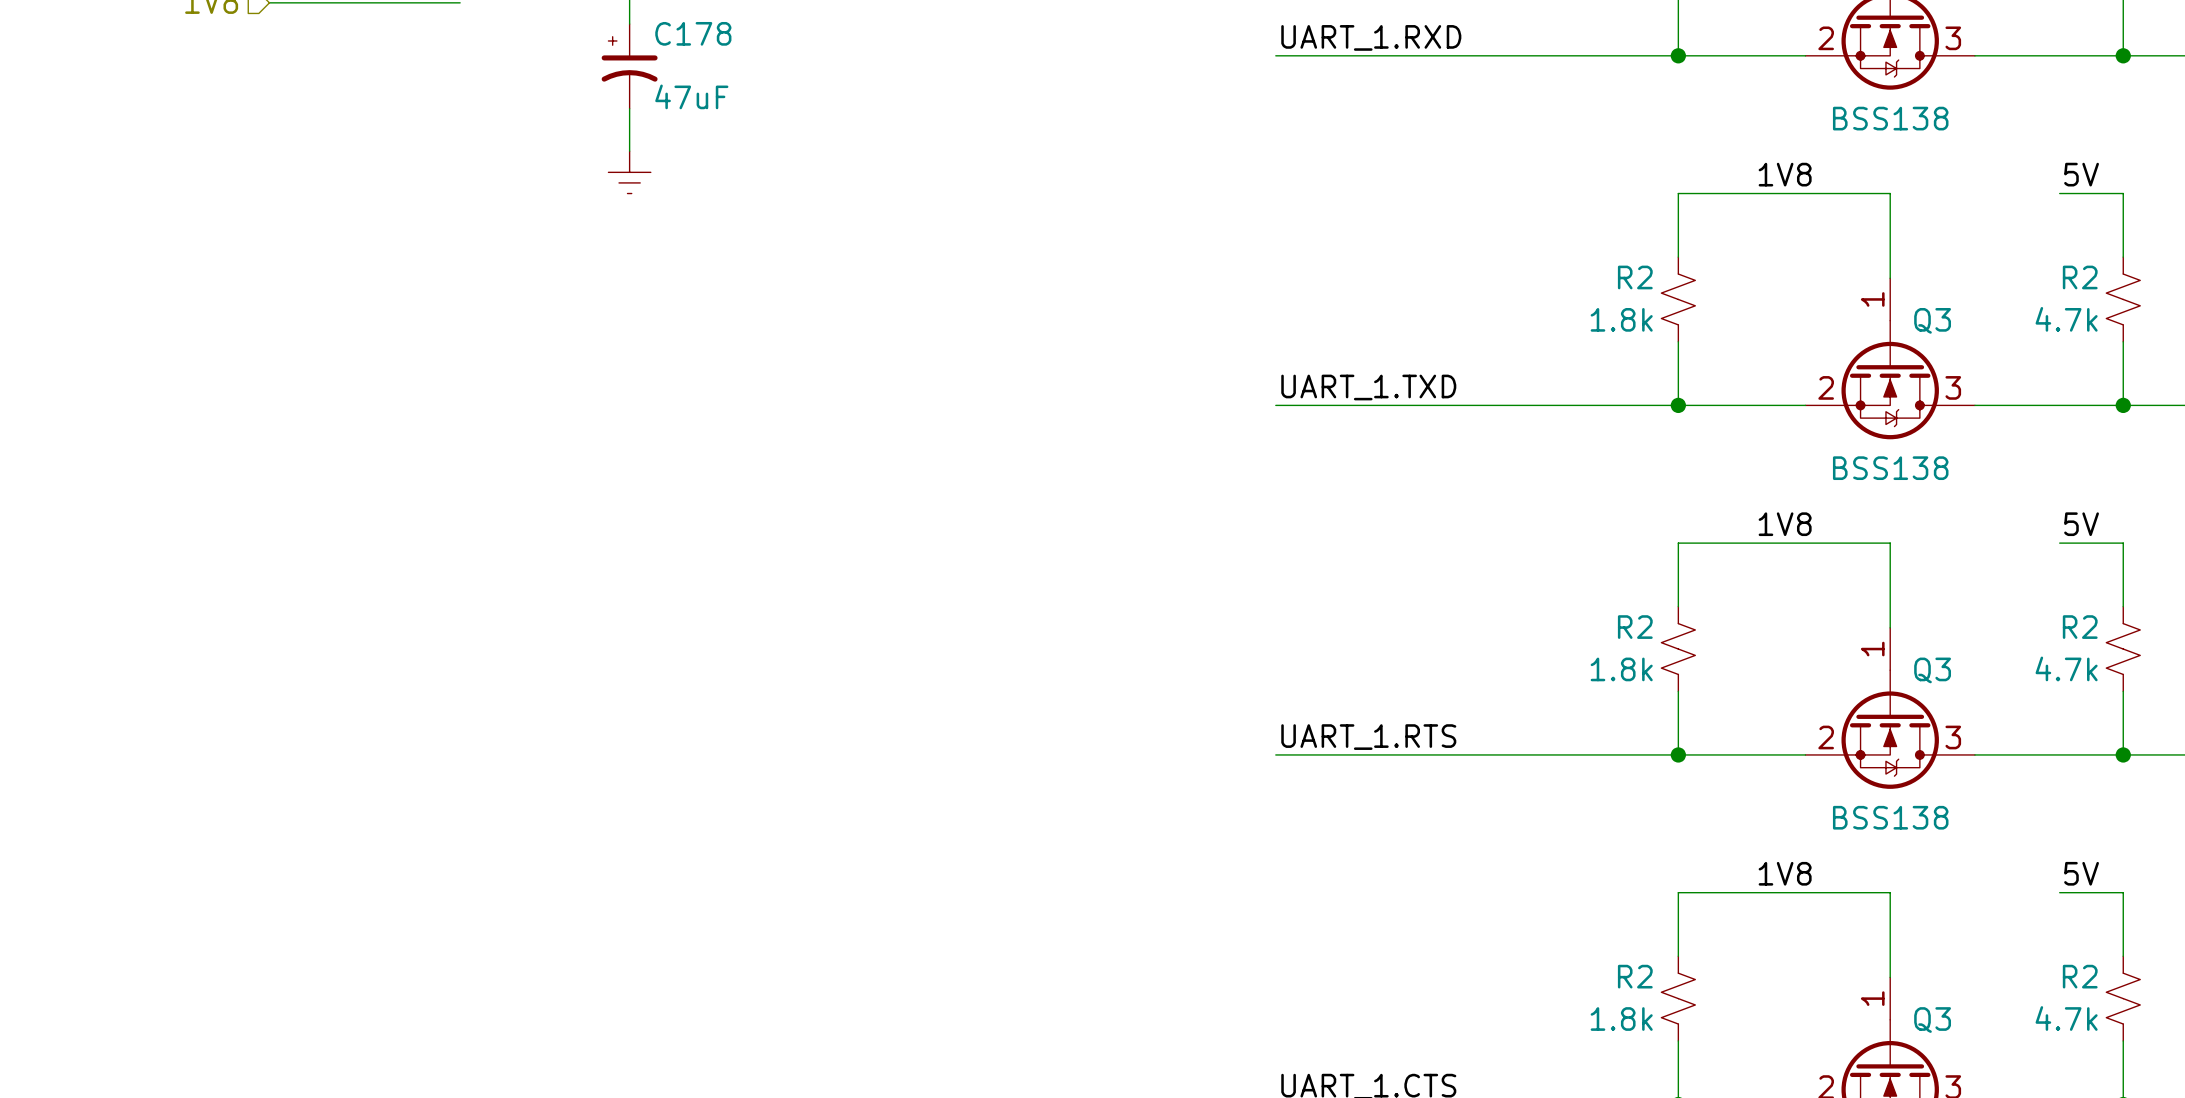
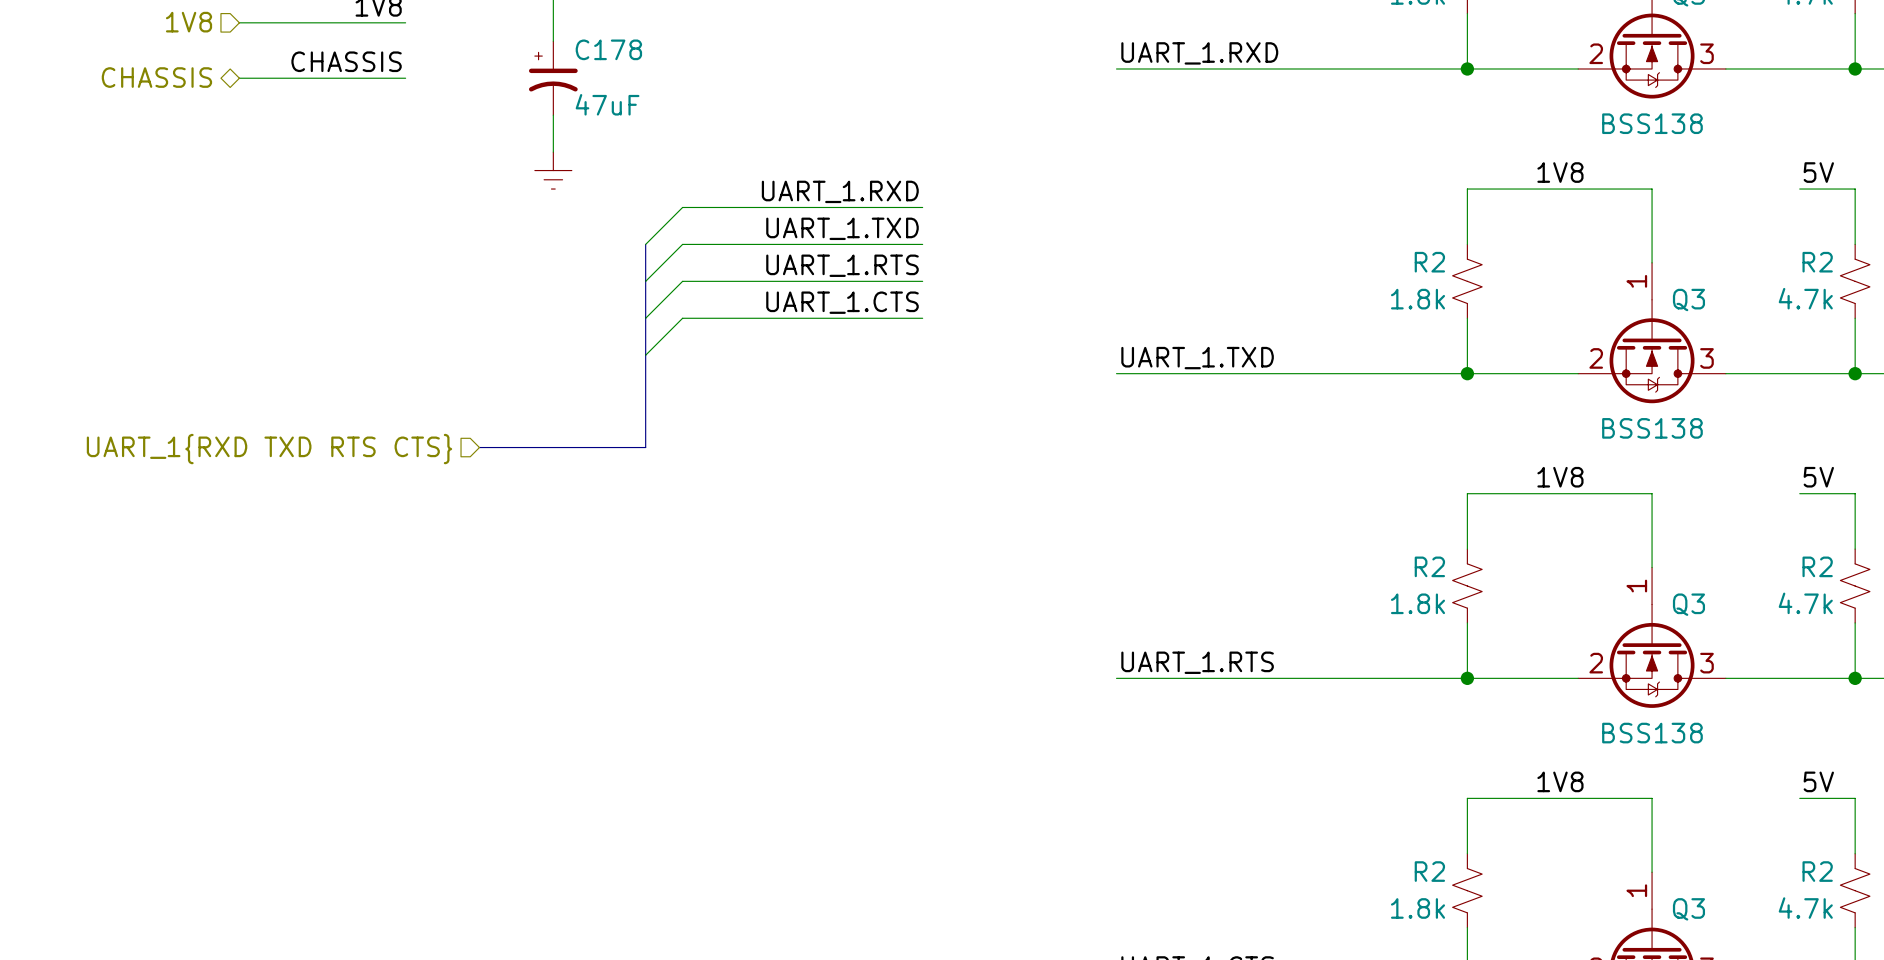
label: none -> CHASSIS (346, 61)
hierarchical label: none -> CHASSIS (156, 77)
wire: none -> (239, 78) (405, 78)
label: none -> UART_1.RXD (840, 191)
wire: none -> (922, 207) (682, 207) (645, 244)
label: none -> UART_1.TXD (842, 228)
bus: none -> (645, 244) (645, 447) (479, 447)
wire: none -> (682, 244) (922, 244)
wire: none -> (682, 244) (645, 281)
label: none -> UART_1.RTS (842, 265)
wire: none -> (922, 281) (682, 281) (645, 318)
label: none -> UART_1.CTS (842, 302)
wire: none -> (922, 318) (682, 318) (645, 355)
hierarchical label: none -> UART_1{RXD TXD RTS CTS} (269, 449)

